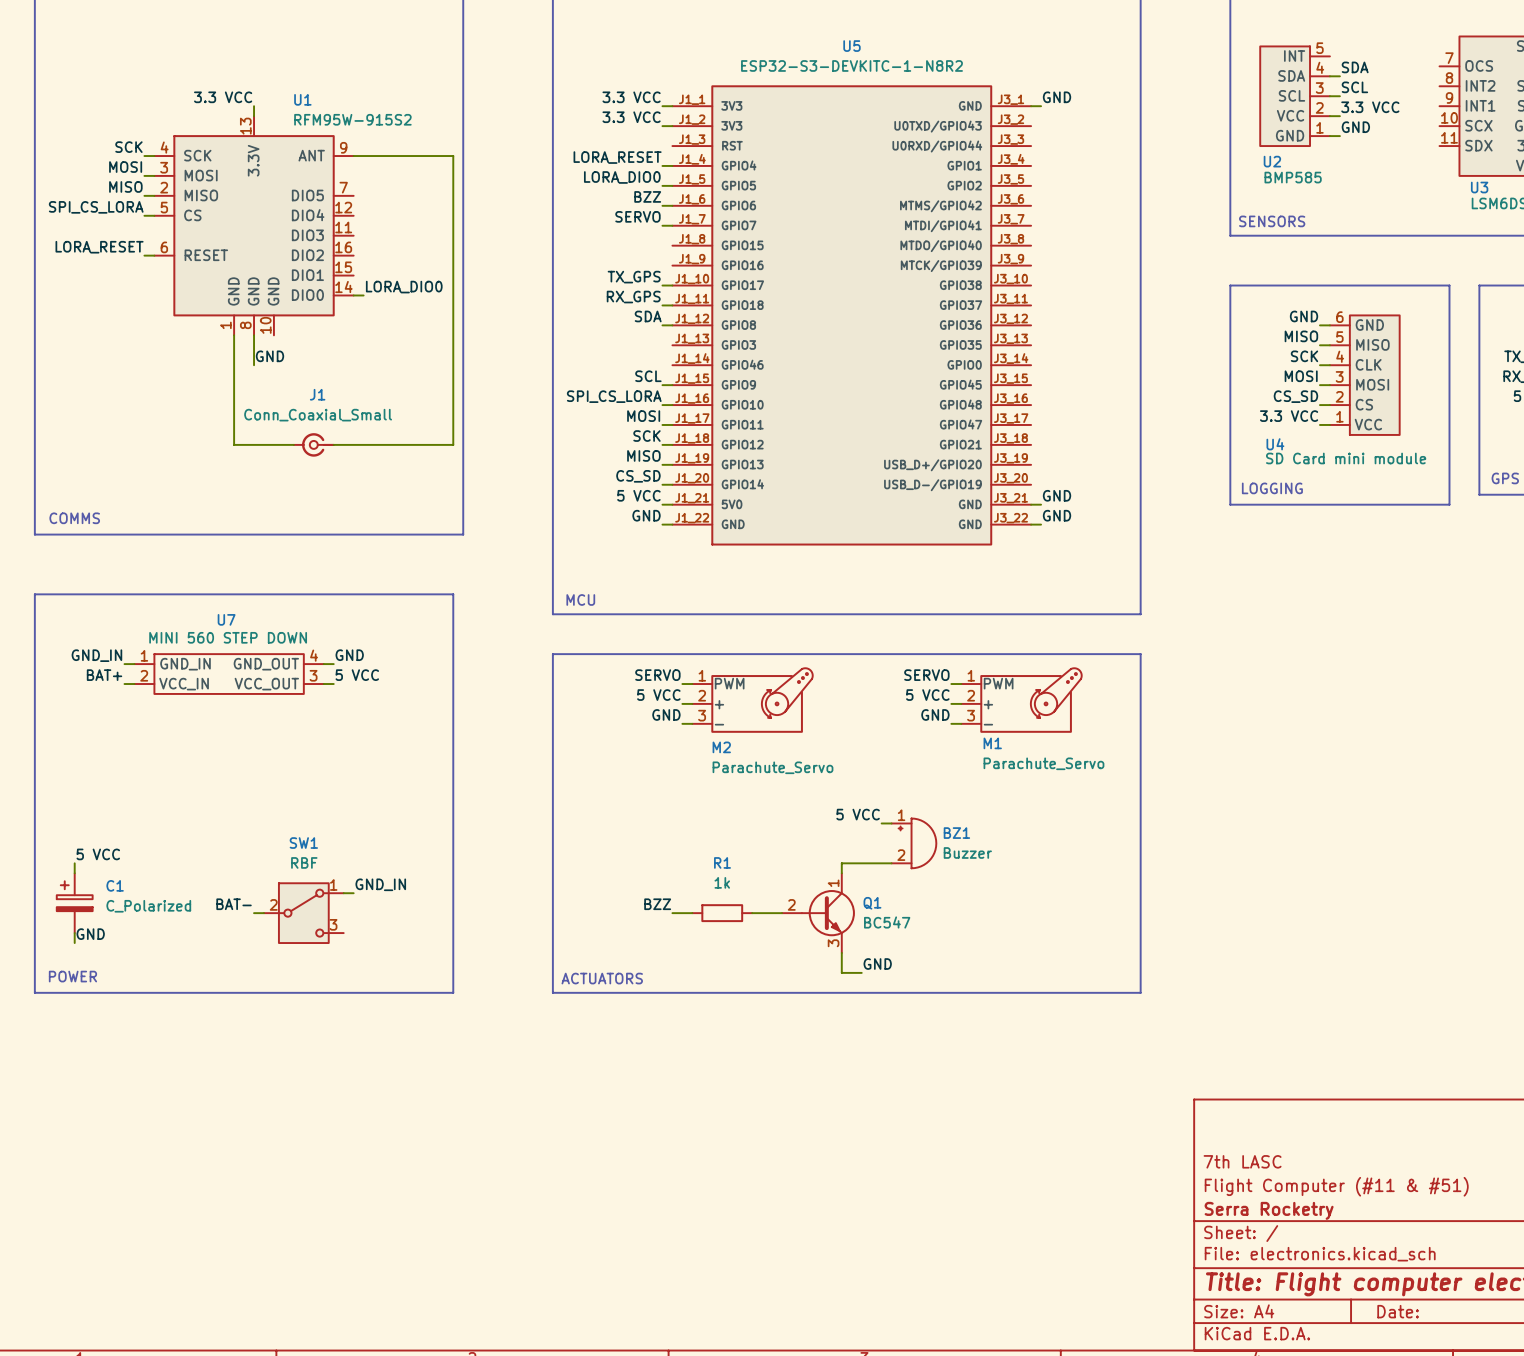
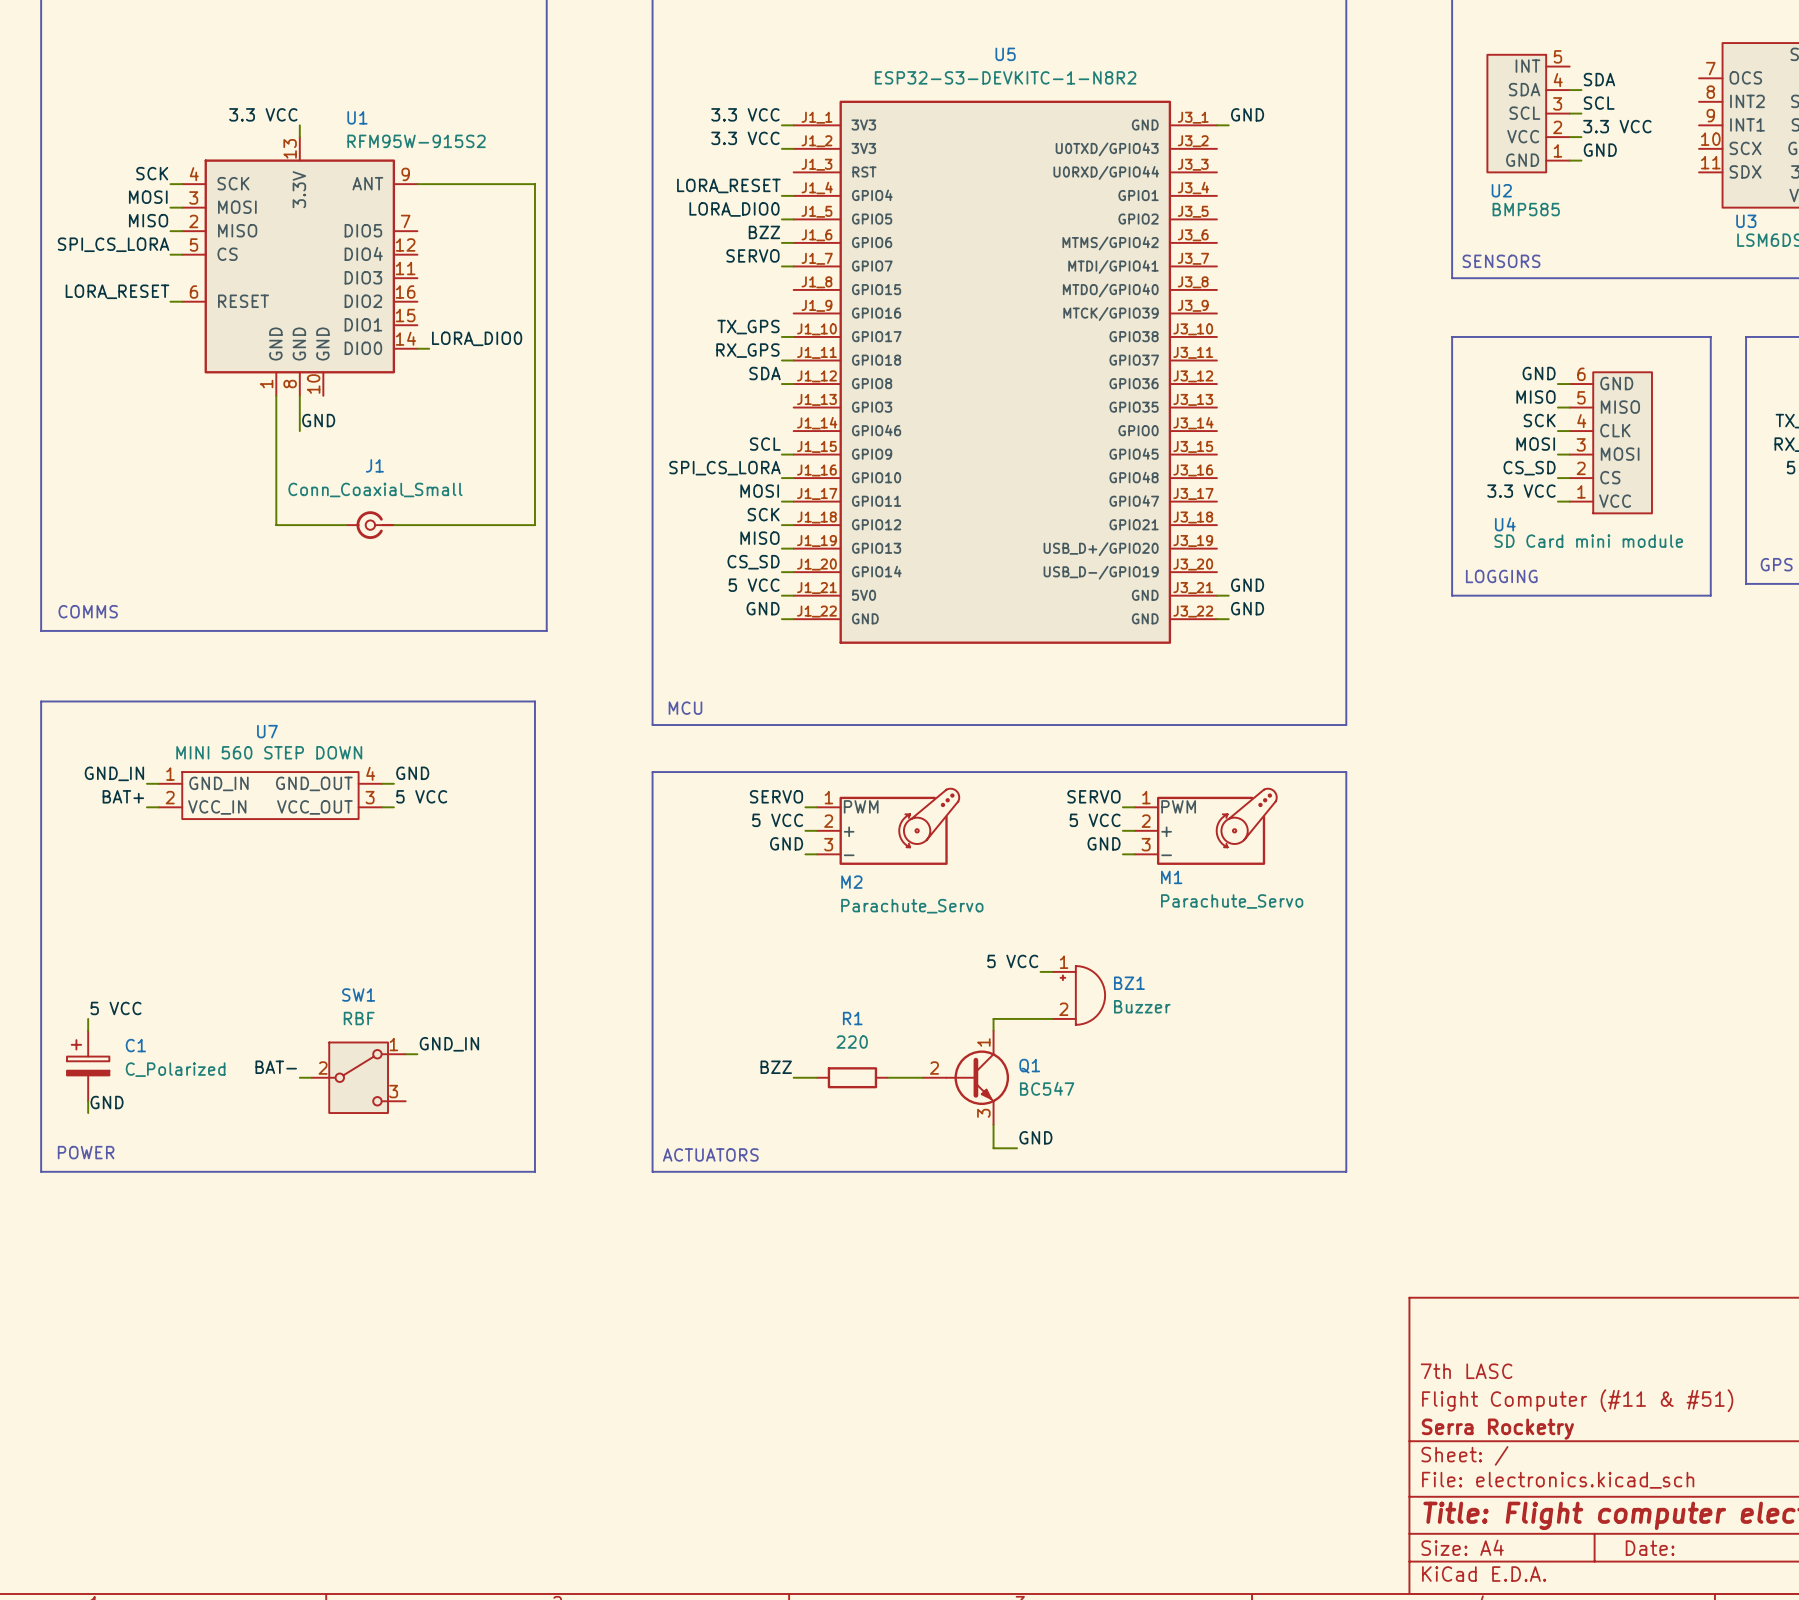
R1 value: 1k (722, 882) -> 220 (852, 1042)

